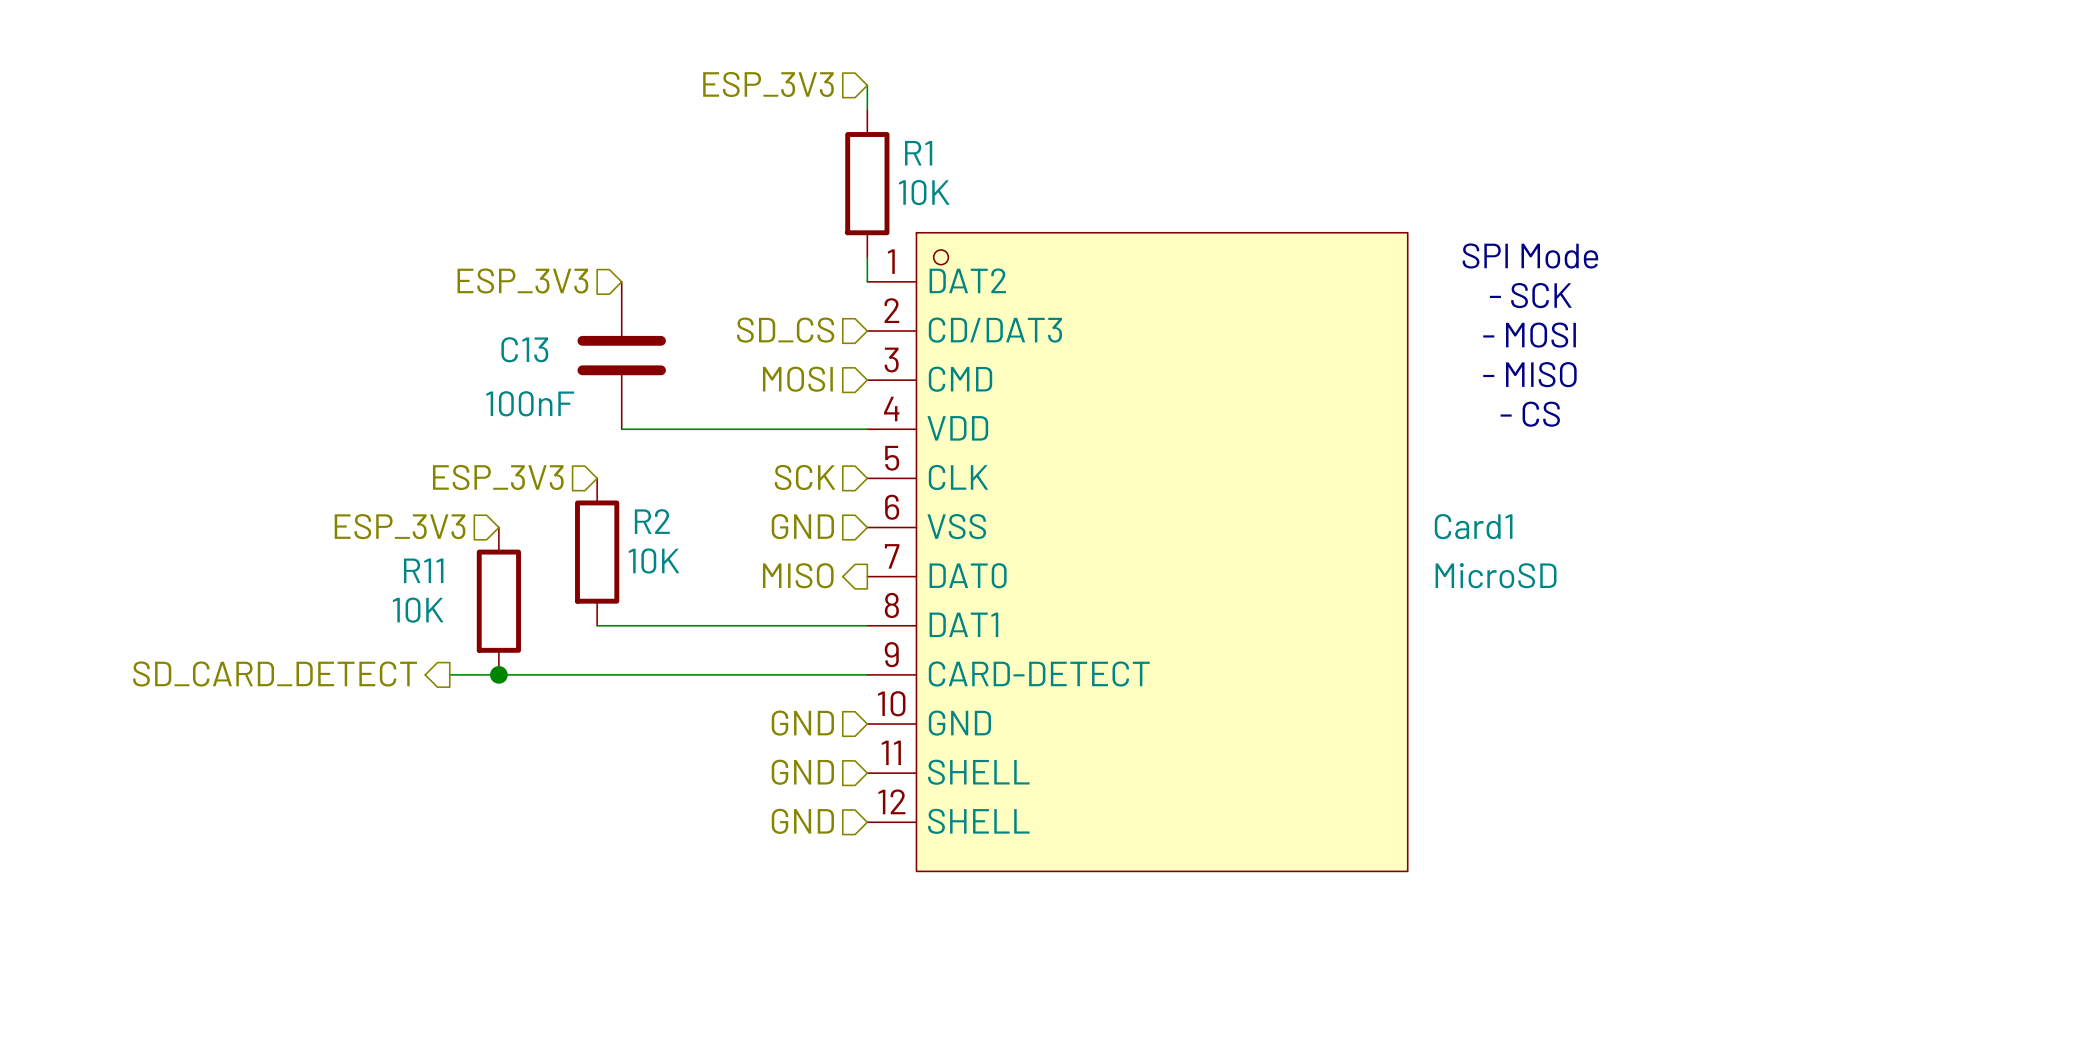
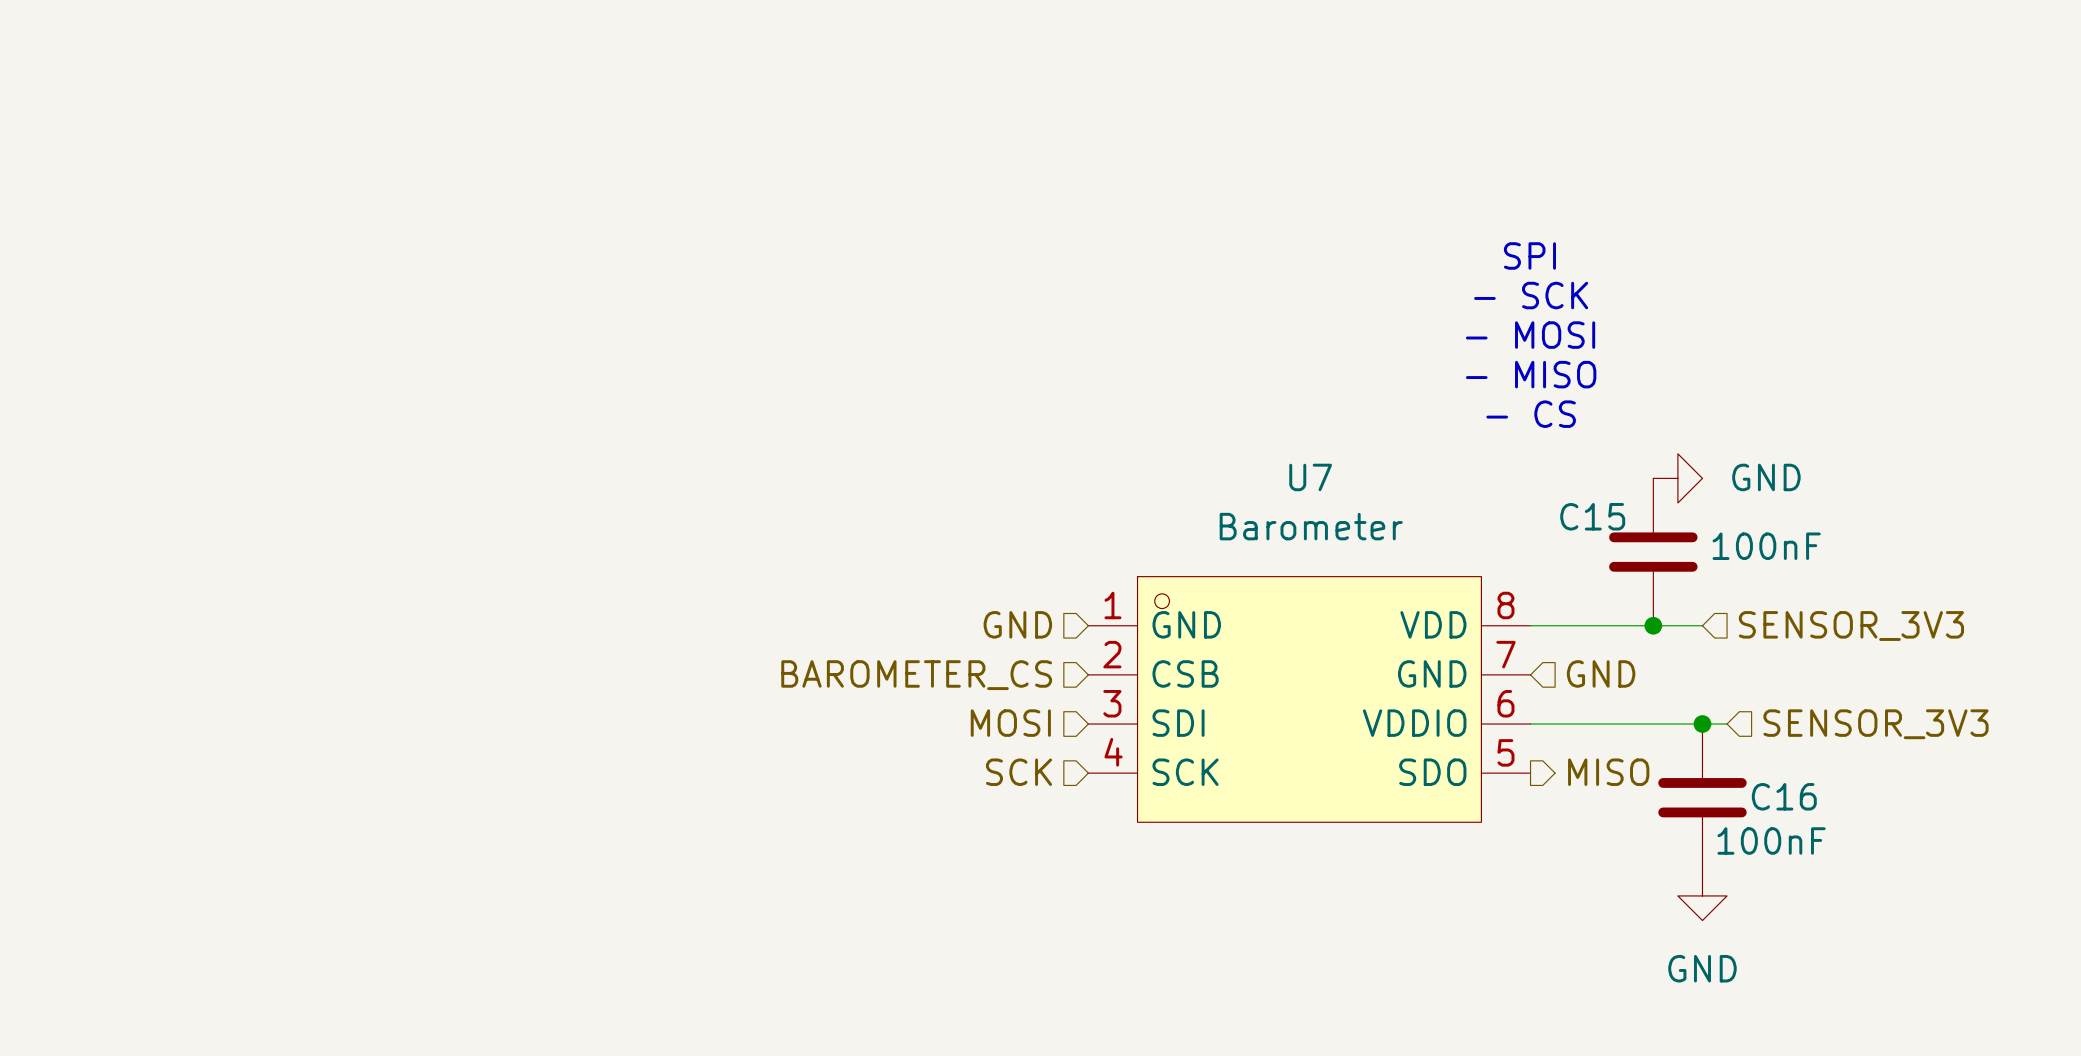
hierarchical label: ESP_3V3 (768, 84) -> none
wire: (867, 85) (867, 109) -> none
R1: 10K (867, 183) -> none
text: SPI Mode (1530, 256) -> SPI (1529, 255)
wire: (867, 257) (867, 281) -> none
hierarchical label: ESP_3V3 (522, 280) -> none
hierarchical label: SD_CS (785, 330) -> none
C13: 100nF (621, 355) -> none
hierarchical label position: MOSI (797, 379) -> MOSI (1010, 723)
wire: (621, 429) (867, 429) -> none
hierarchical label: ESP_3V3 (498, 477) -> none
hierarchical label position: SCK (804, 477) -> SCK (1019, 772)
power symbol: none -> GND (1677, 478)
hierarchical label: ESP_3V3 (400, 526) -> none
hierarchical label: GND (802, 526) -> none
R2: 10K (597, 552) -> none
Card1: MicroSD (1137, 552) -> none
C15: none -> 100nF (1653, 552)
hierarchical label: MISO (798, 575) -> none
R11: 10K (498, 601) -> none
hierarchical label: none -> GND (1017, 624)
hierarchical label: none -> SENSOR_3V3 (1851, 626)
wire: (597, 625) (867, 625) -> none
wire: none -> (1530, 625) (1702, 625)
junction: none -> (1653, 625)
hierarchical label: SD_CARD_DETECT (275, 673) -> none
hierarchical label: none -> BAROMETER_CS (916, 675)
hierarchical label: none -> GND (1601, 673)
wire: (449, 674) (867, 674) -> none
junction: (498, 674) -> none
U7: none -> Barometer (1309, 699)
hierarchical label: GND (802, 723) -> none
hierarchical label: none -> SENSOR_3V3 (1875, 724)
wire: none -> (1530, 724) (1727, 724)
junction: none -> (1702, 724)
hierarchical label: GND (802, 772) -> none
hierarchical label: none -> MISO (1608, 772)
C16: none -> 100nF (1702, 797)
hierarchical label: GND (802, 821) -> none
power symbol: none -> GND (1702, 895)

